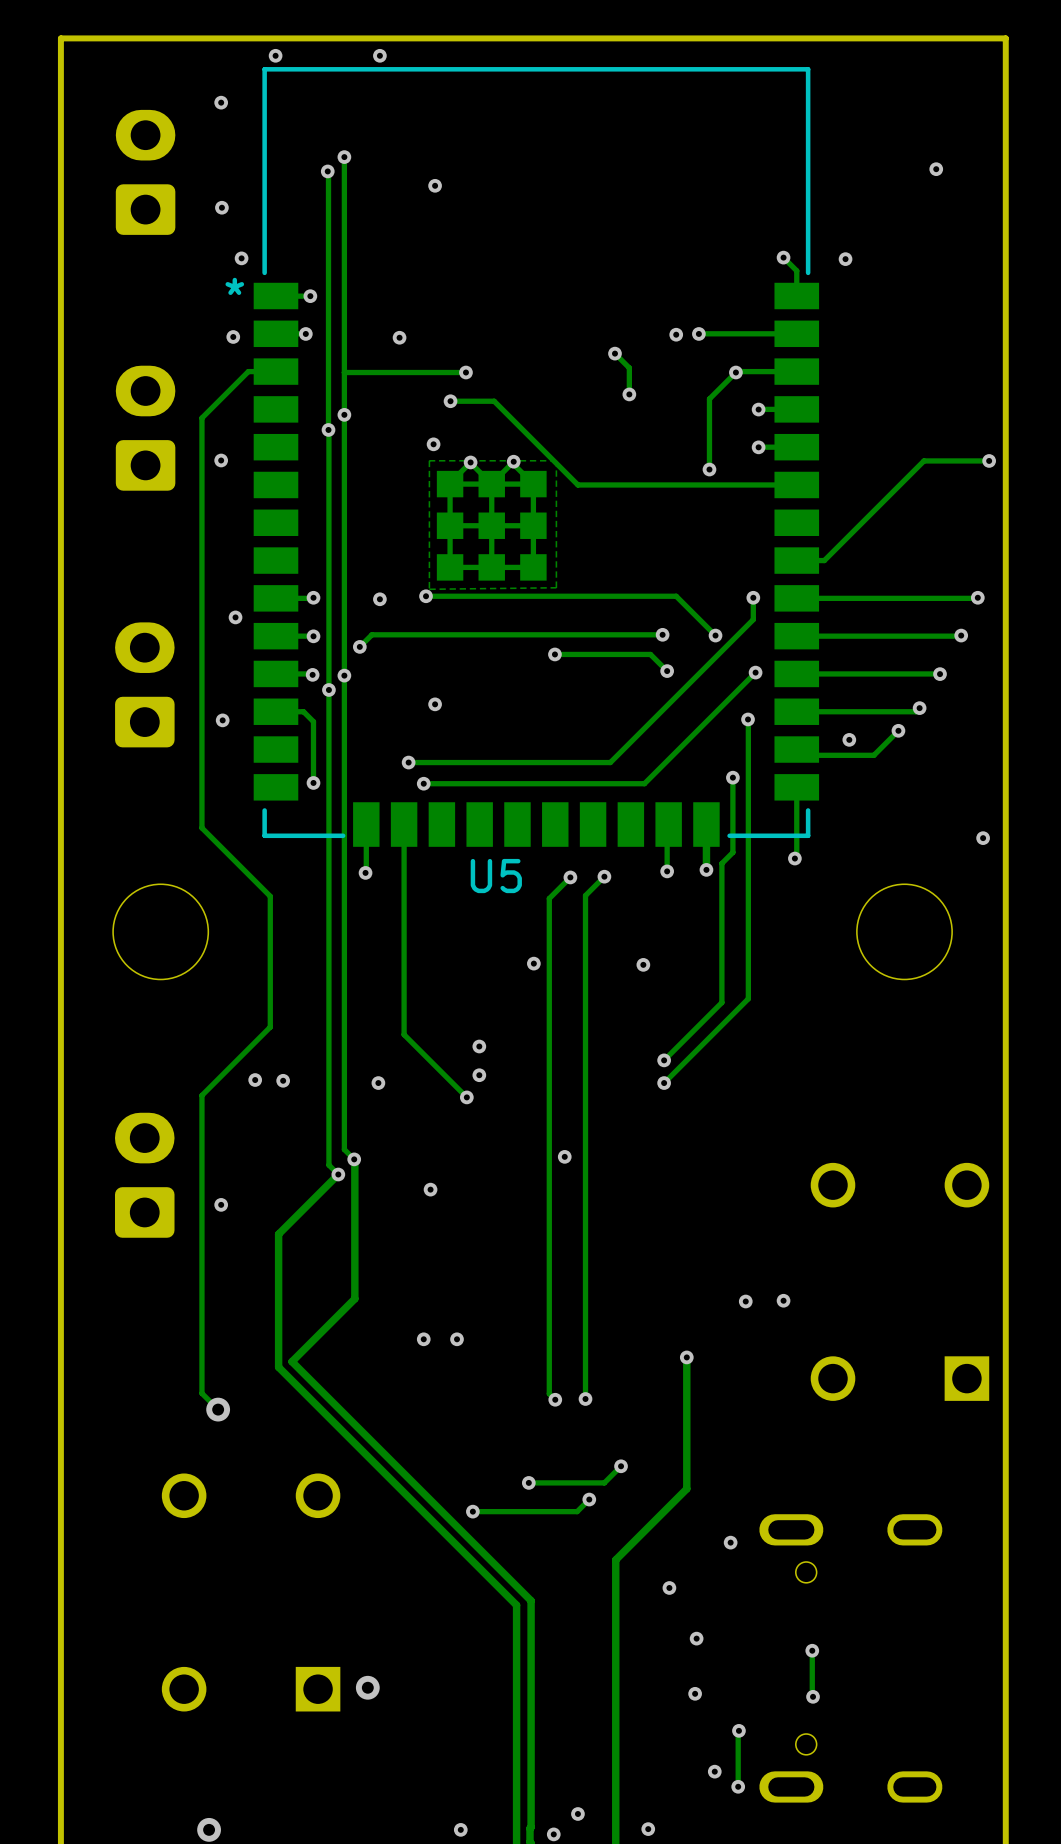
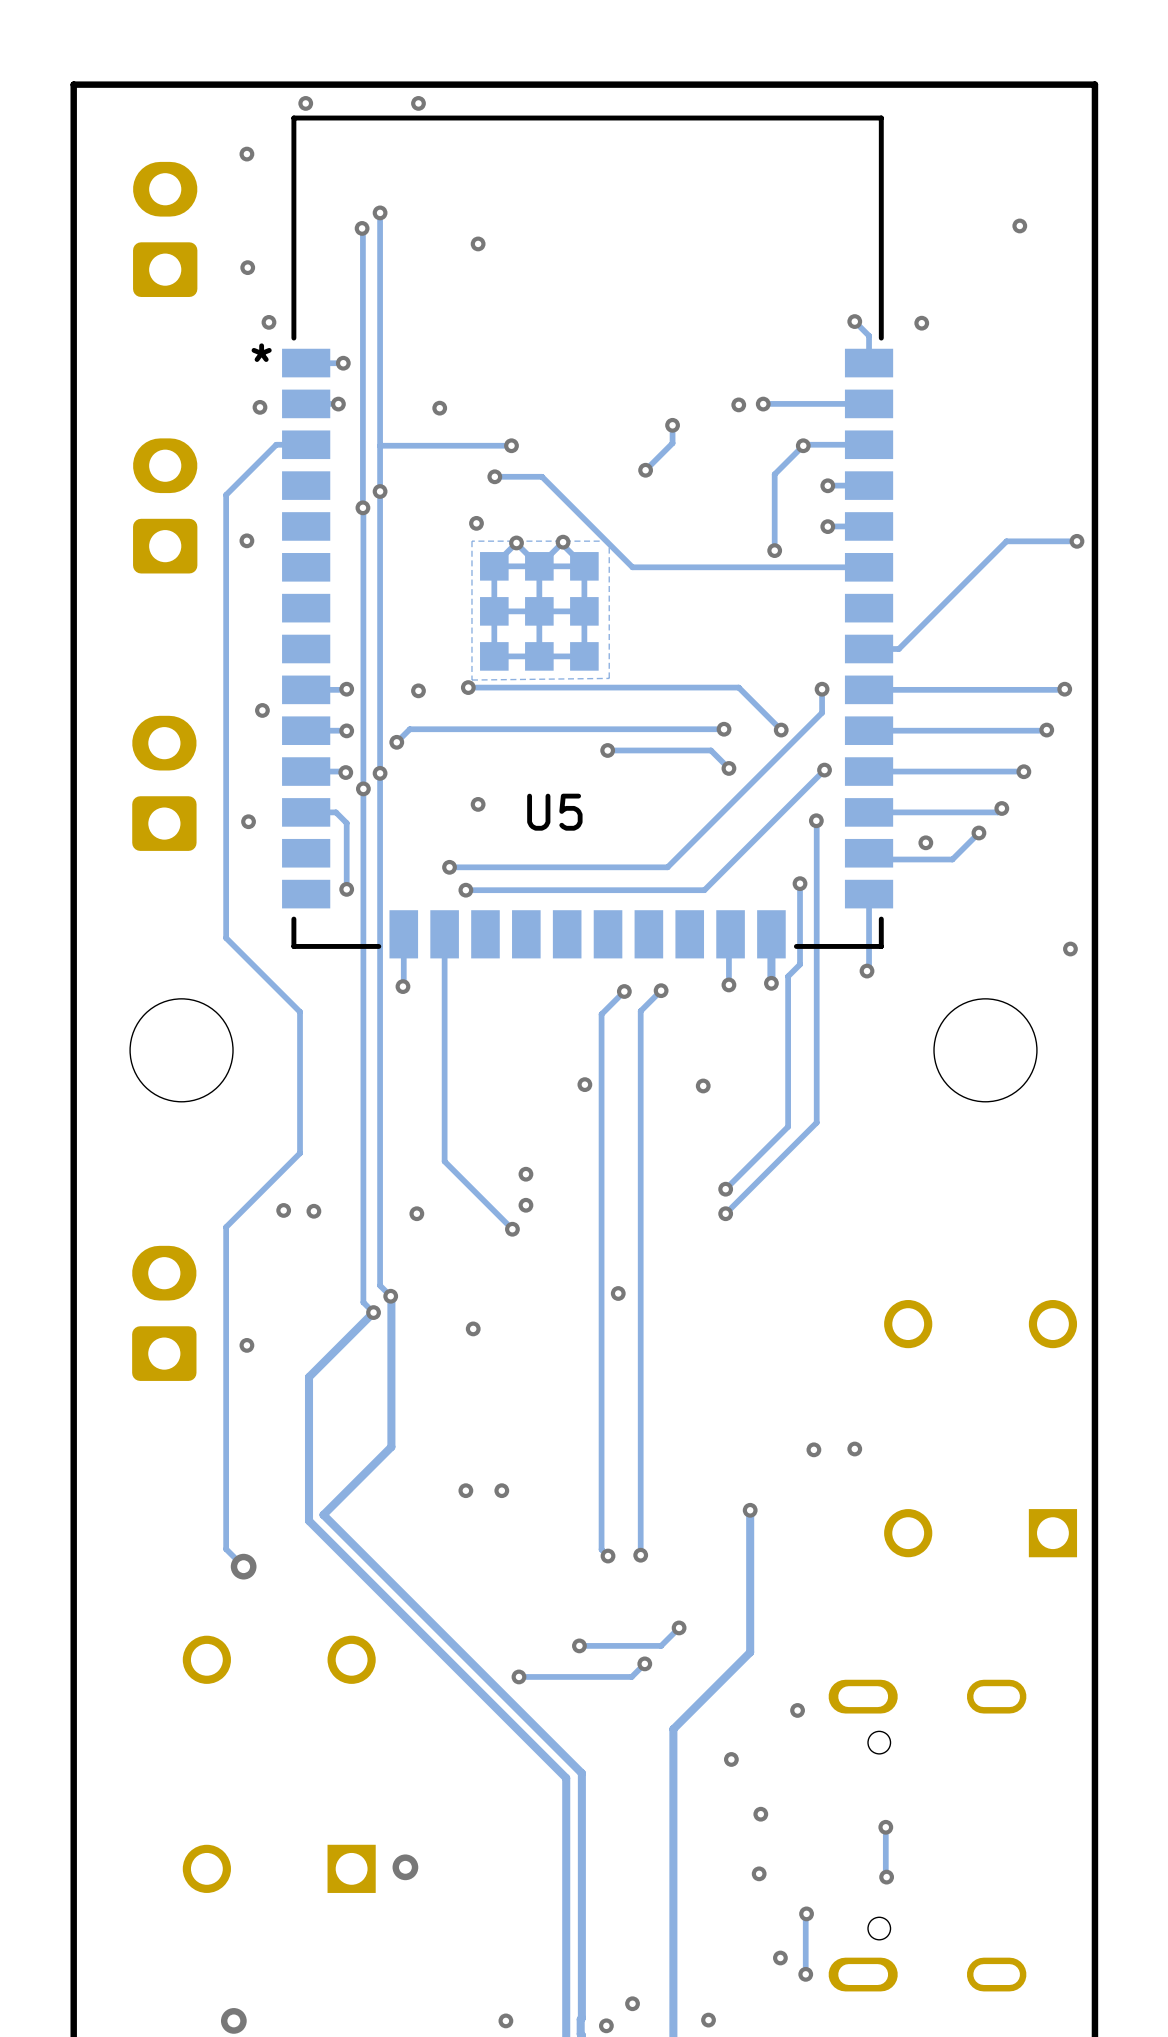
track: (614, 353) (629, 367) (629, 394) -> (672, 425) (672, 443) (645, 470)
via position: (629, 394) -> (645, 470)
U5 name position: U5 (496, 876) -> U5 (554, 812)

